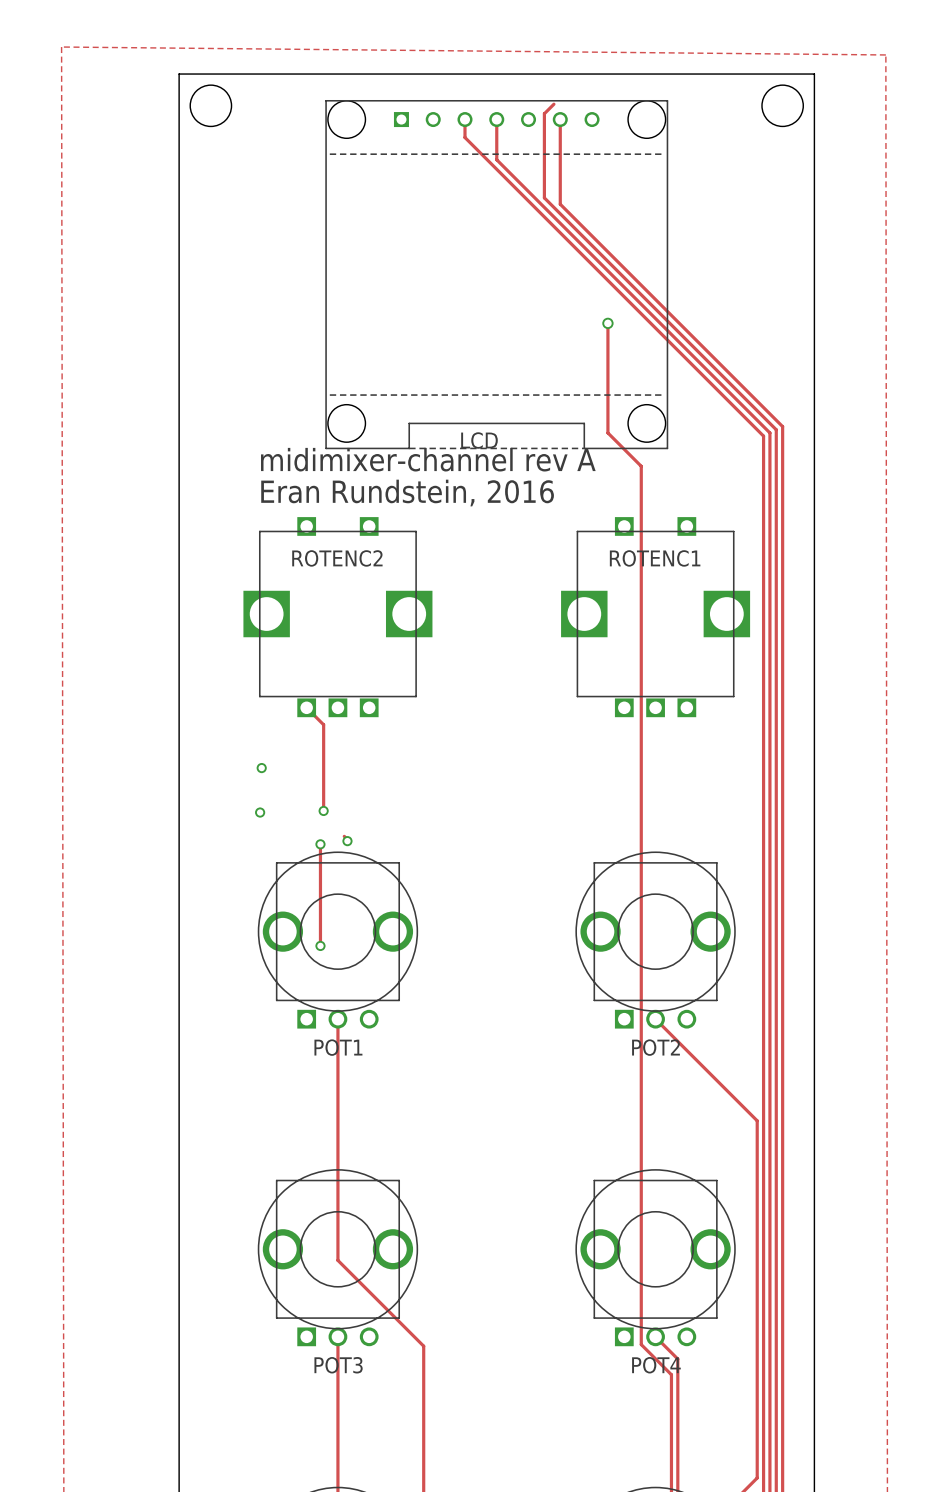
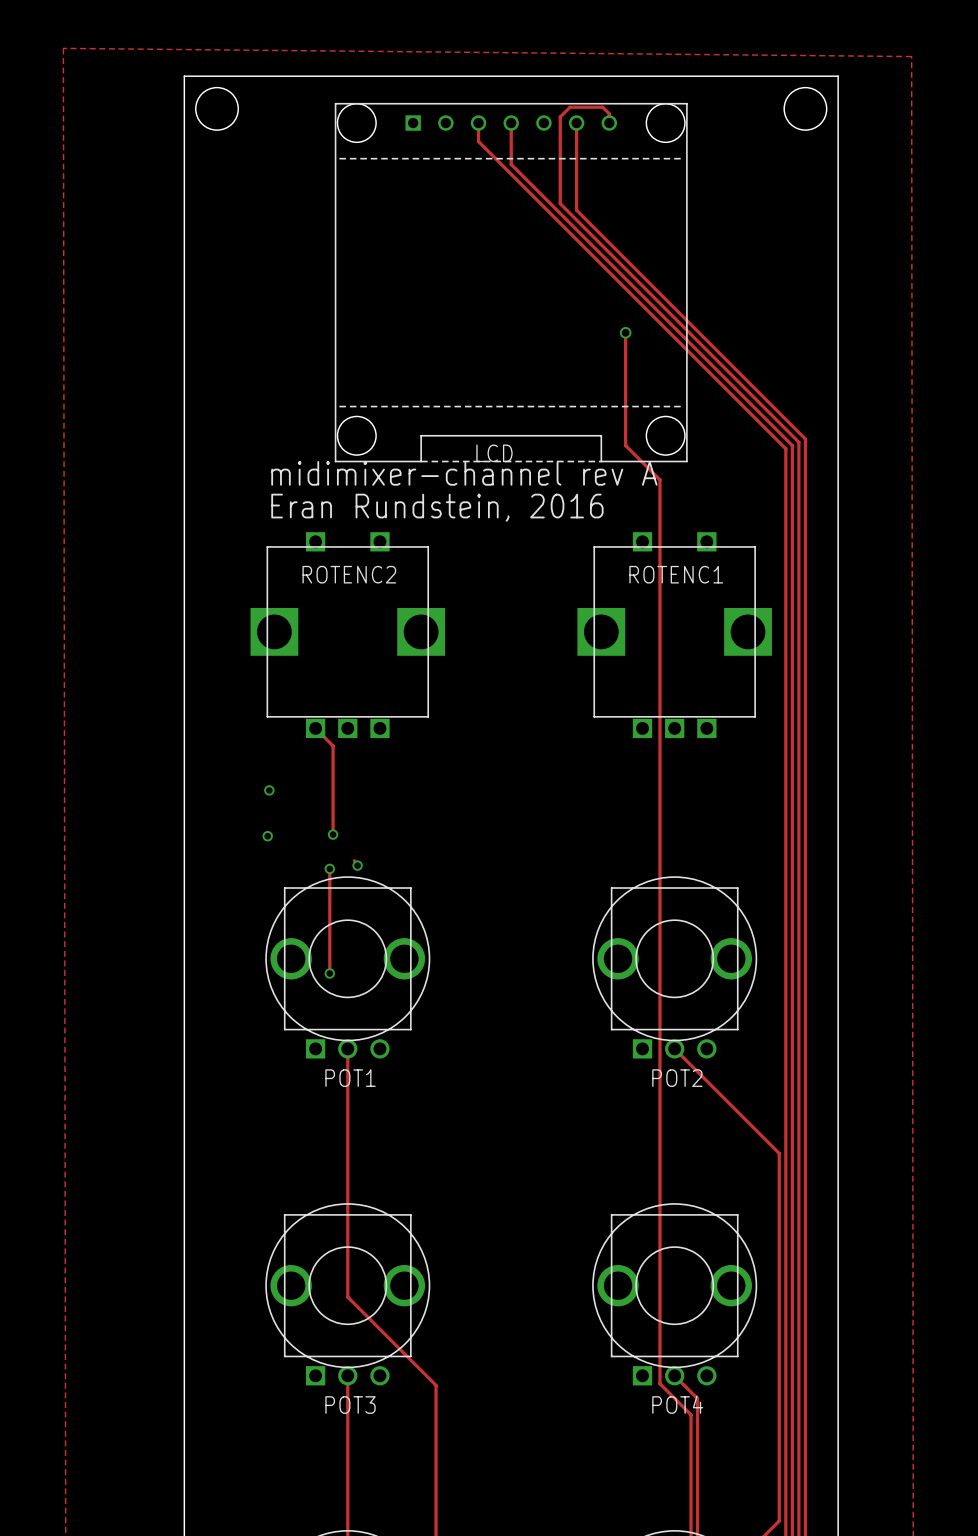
track: none -> (570, 107) (602, 107) (609, 113) (609, 123)

